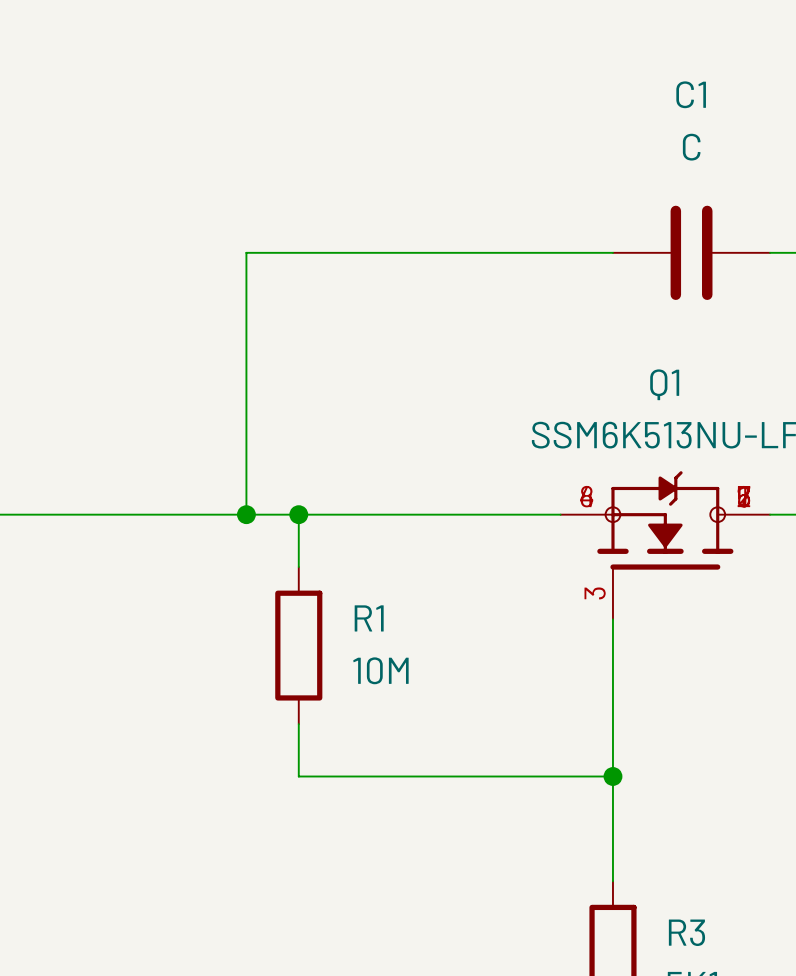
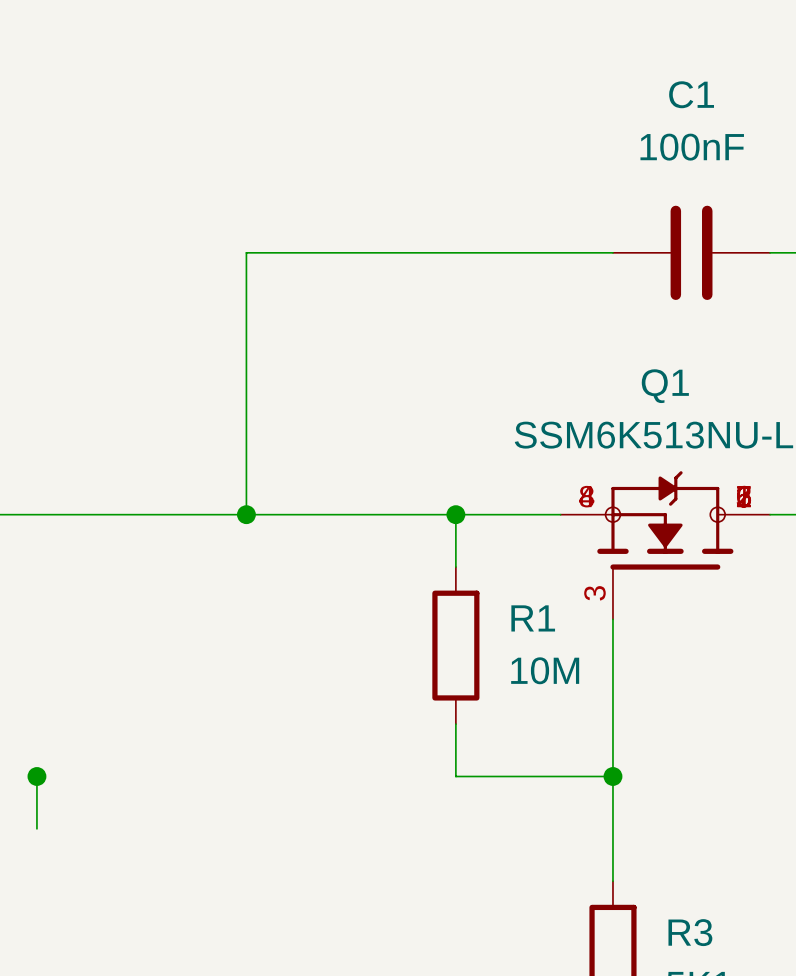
C1 value: C (691, 147) -> 100nF (692, 147)
wire: (298, 514) (298, 567) -> (455, 514) (455, 567)
junction: (298, 514) -> none
junction: none -> (455, 514)
R1 position: (298, 645) -> (455, 645)
wire: (298, 724) (298, 776) (455, 776) -> (455, 724) (455, 776)
wire: none -> (36, 776) (36, 828)
junction: none -> (36, 776)

